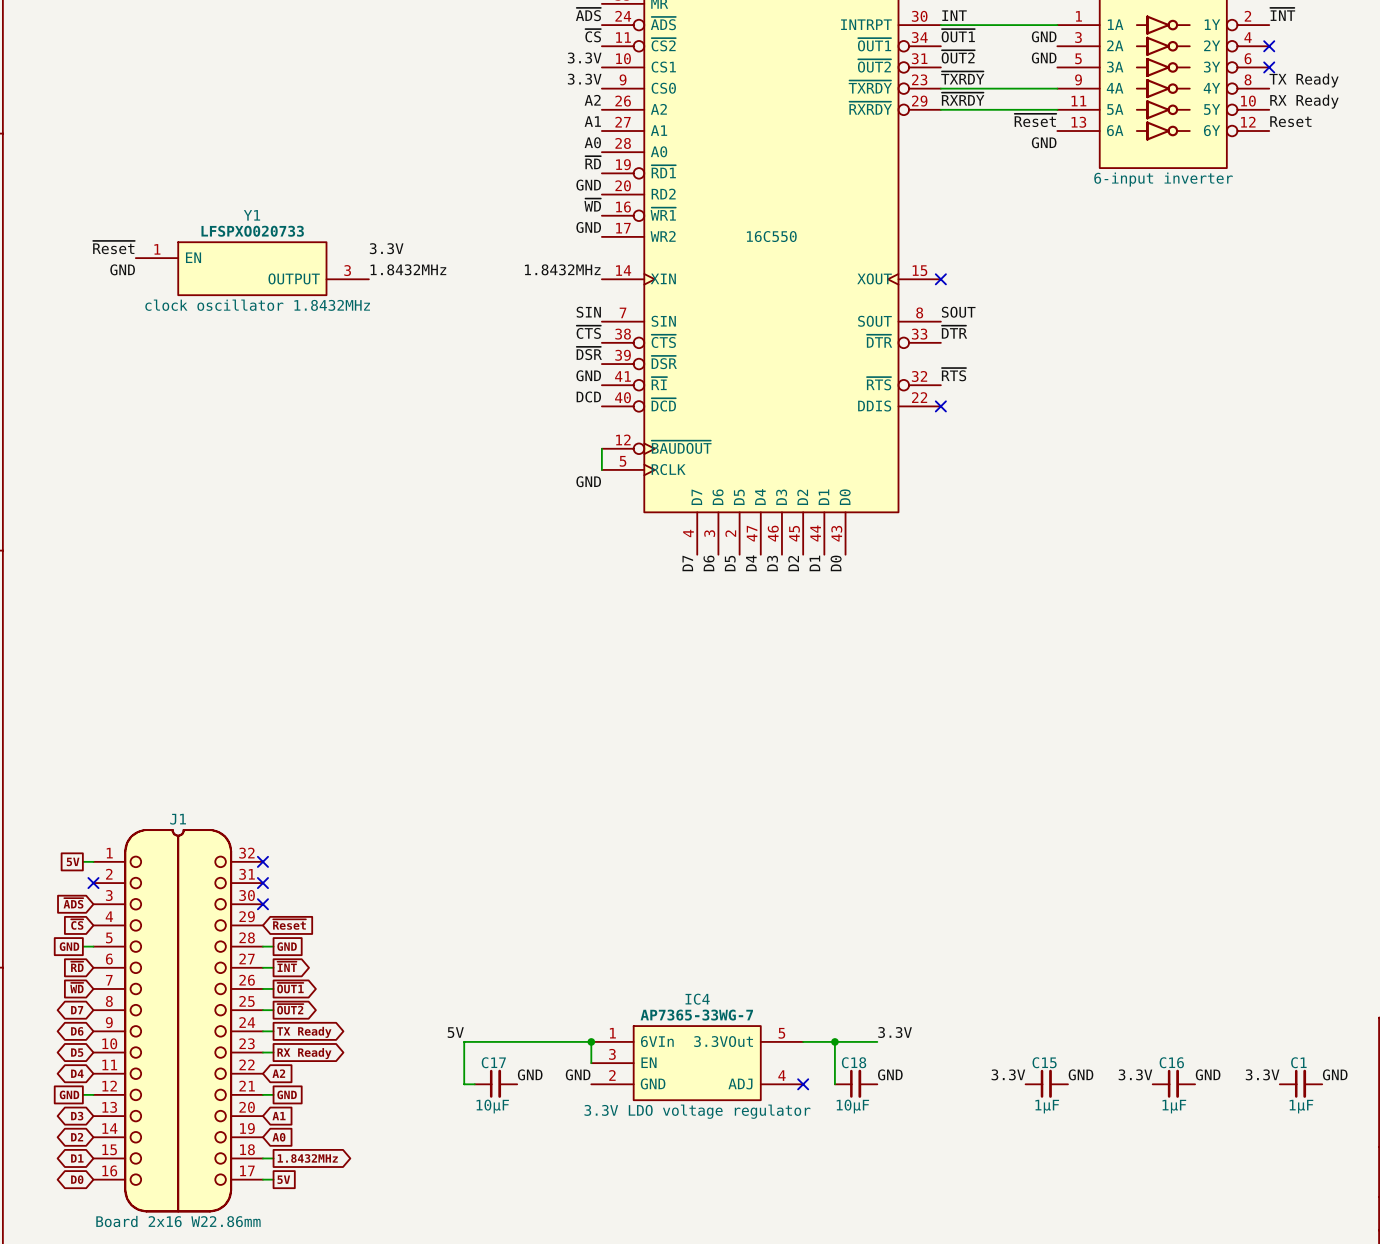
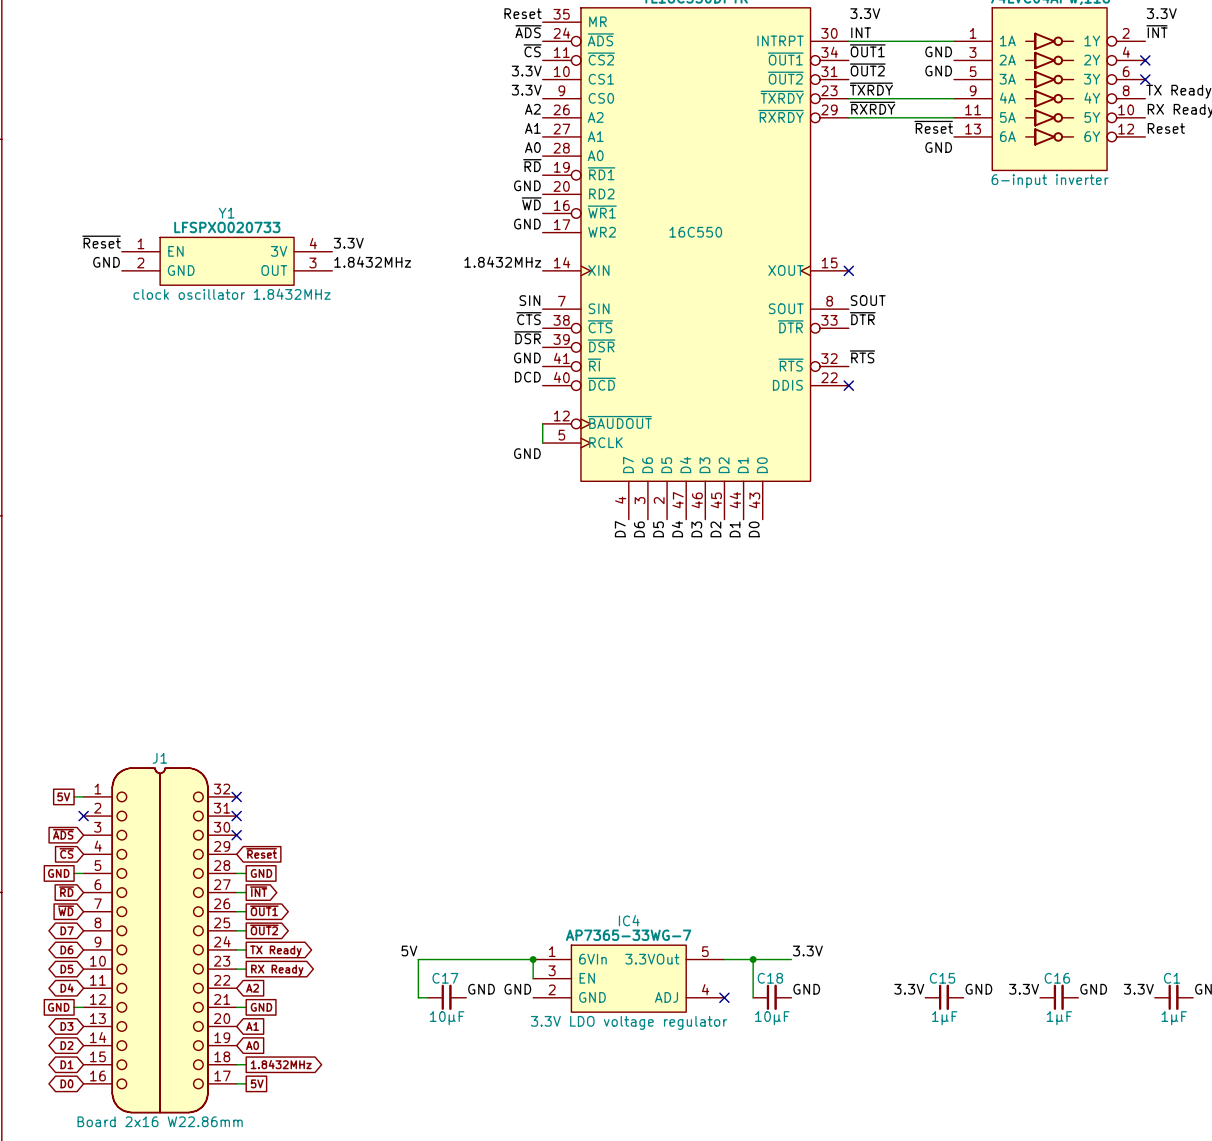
Y1 symbol: [135, 241, 369, 296] -> [121, 236, 333, 286]

